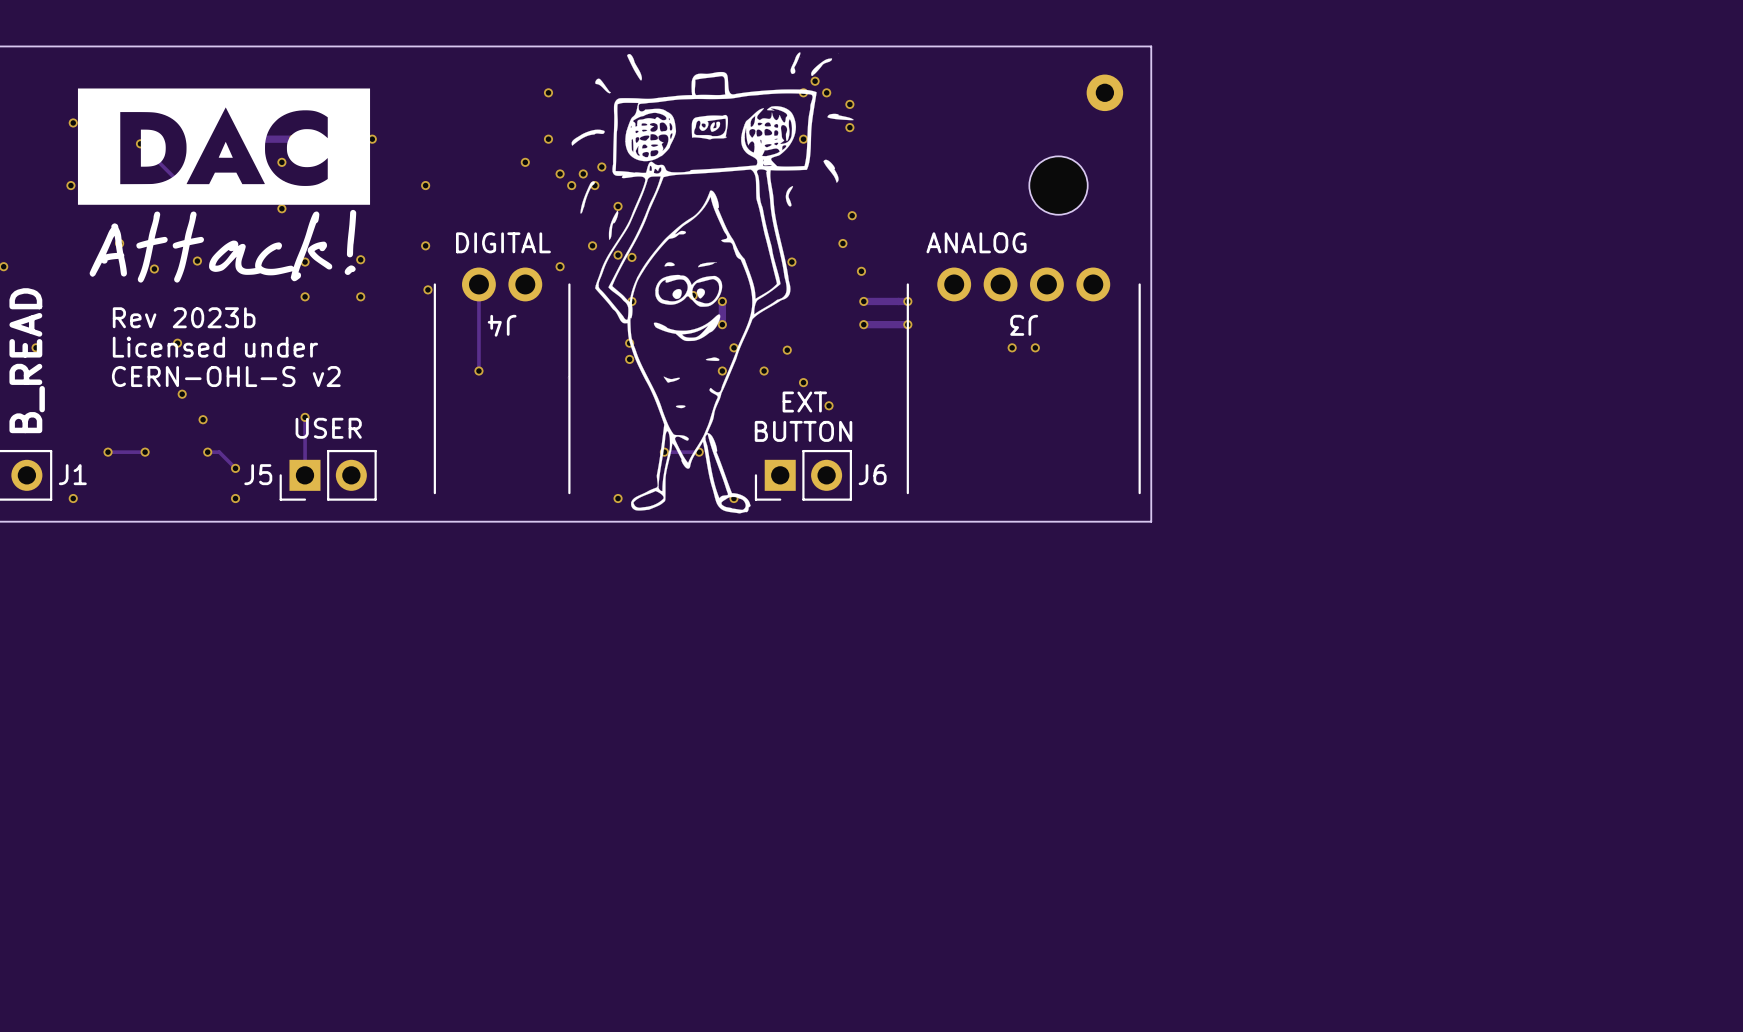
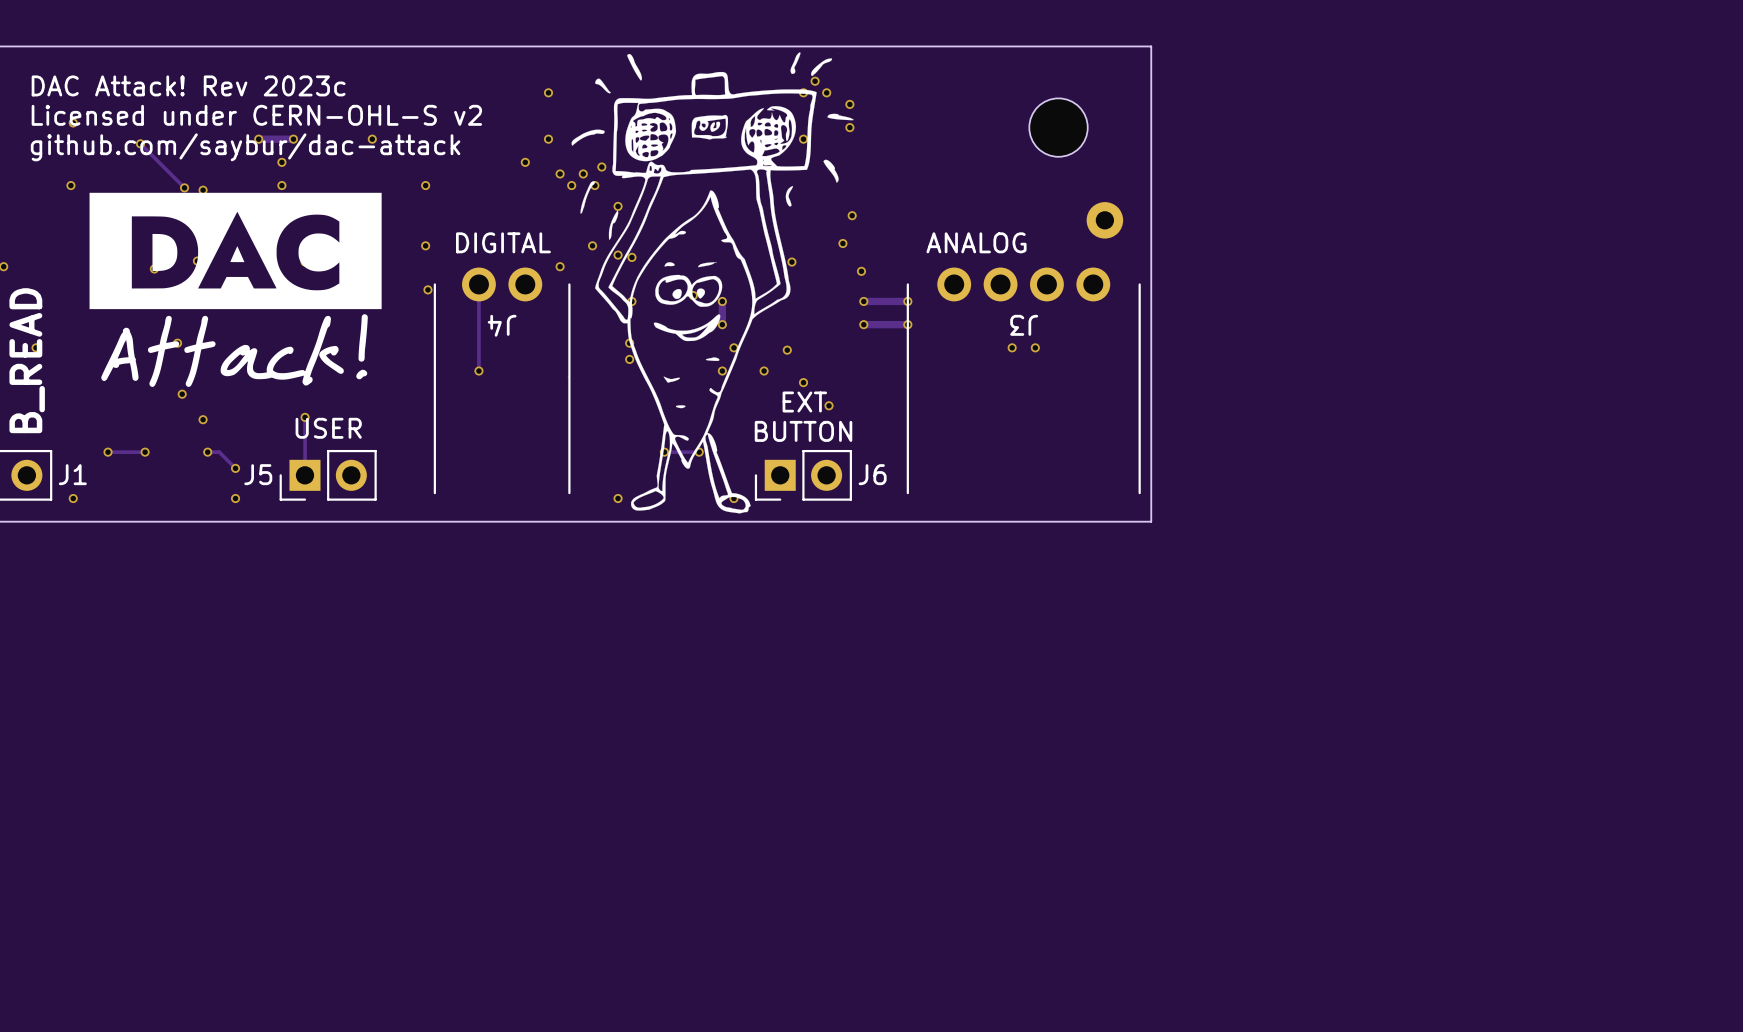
text: none -> DAC Attack! Rev 2023c (188, 85)
part position: (1104, 92) -> (1104, 220)
text: none -> Licensed under CERN-OHL-S v2 (256, 115)
text: none -> github.com/saybur/dac-attack (245, 147)
drawing position: (224, 185) -> (235, 289)
part position: (1058, 185) -> (1058, 127)
text: Rev 2023b (184, 317) -> none
text: Licensed under (215, 347) -> none
text: CERN-OHL-S v2 (226, 376) -> none

